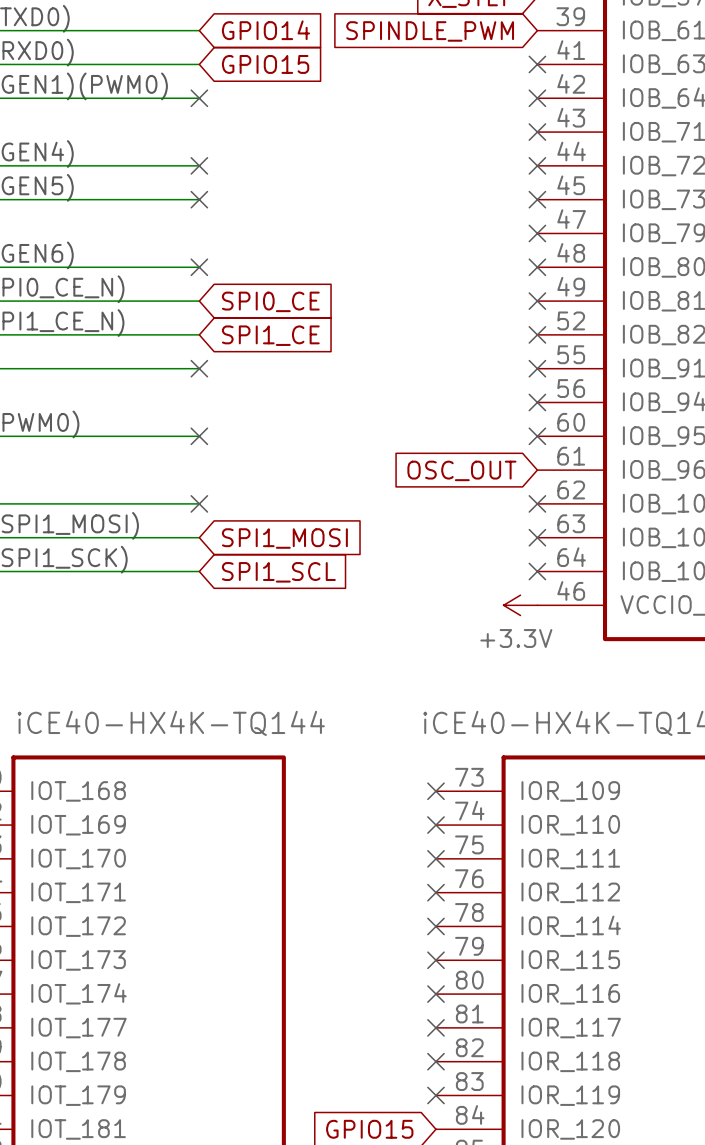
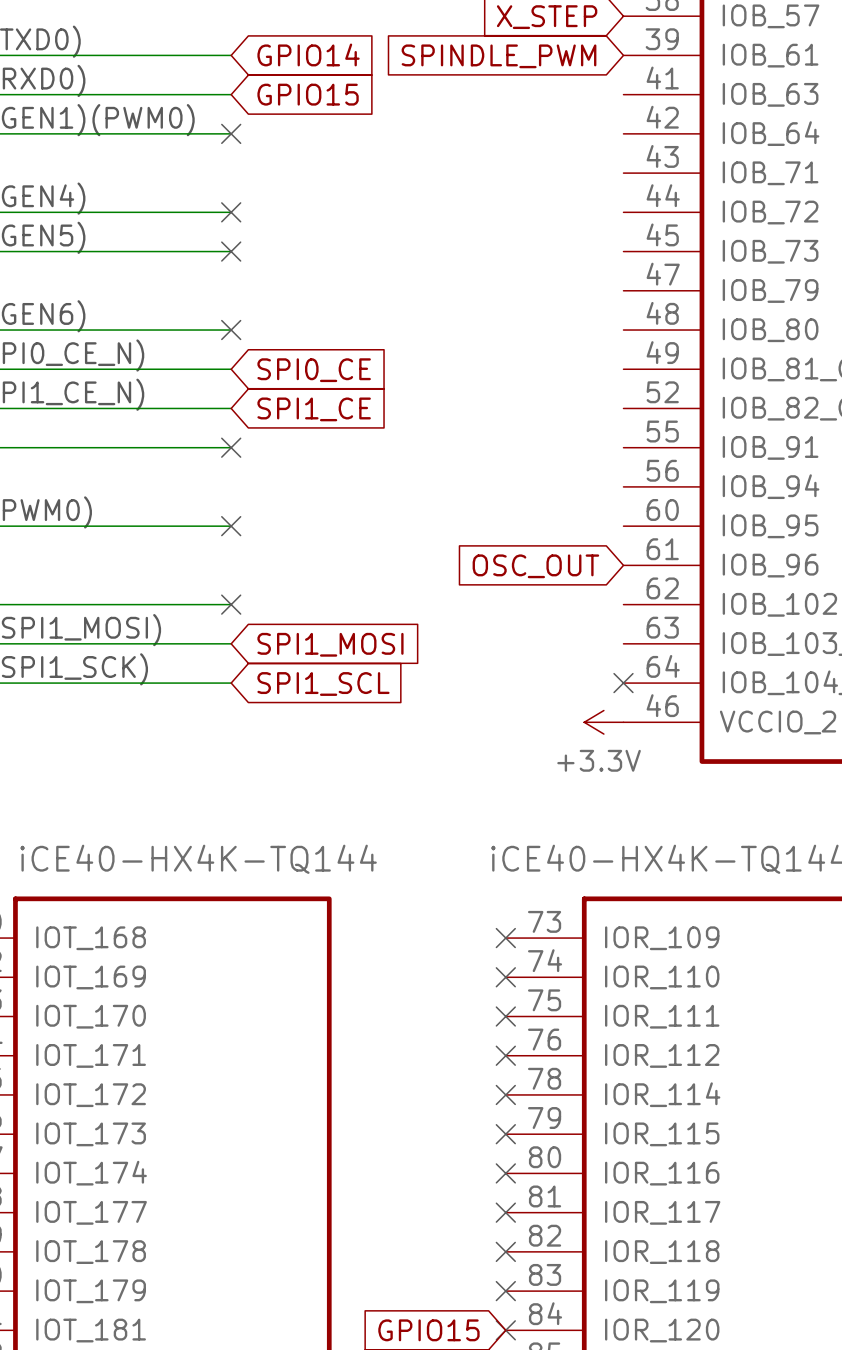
no-connect mark: (537, 64) -> none
no-connect mark: (537, 98) -> none
no-connect mark: (537, 132) -> none
no-connect mark: (537, 165) -> none
no-connect mark: (537, 199) -> none
no-connect mark: (537, 233) -> none
no-connect mark: (537, 267) -> none
no-connect mark: (537, 301) -> none
no-connect mark: (537, 334) -> none
no-connect mark: (537, 368) -> none
no-connect mark: (537, 402) -> none
no-connect mark: (537, 436) -> none
no-connect mark: (537, 503) -> none
no-connect mark: (537, 537) -> none
no-connect mark: none -> (505, 1330)

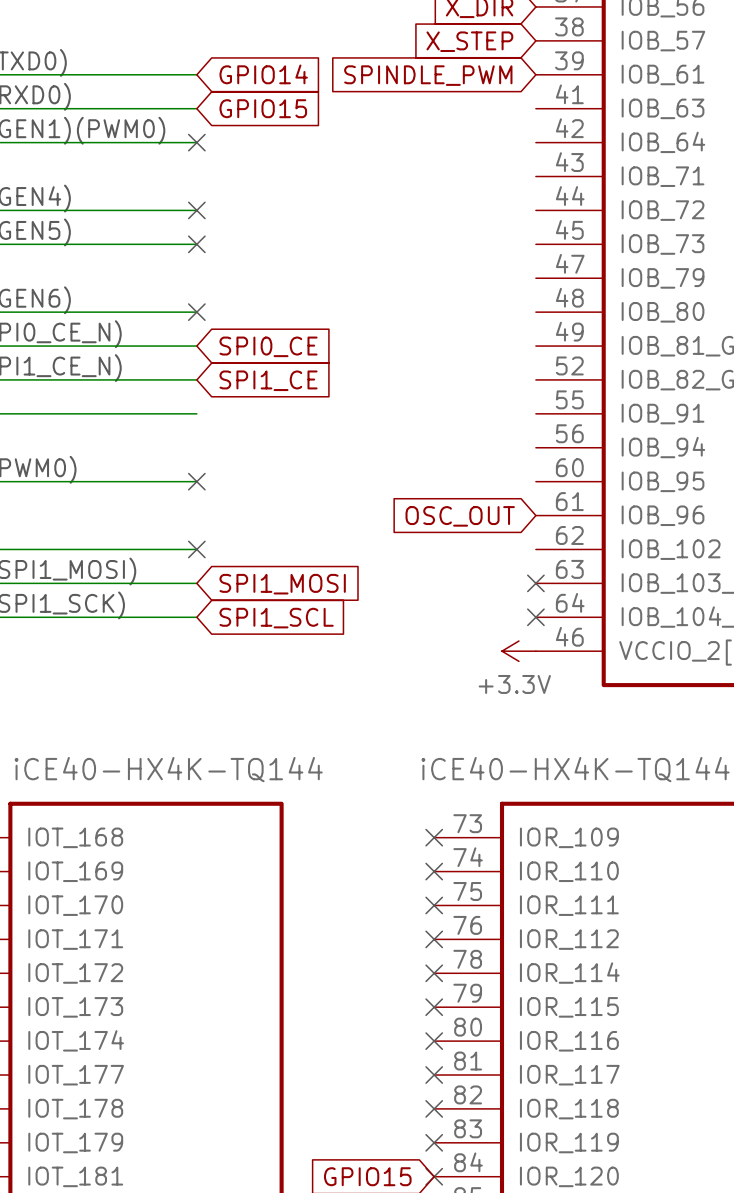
no-connect mark: (231, 447) -> none
no-connect mark: none -> (535, 583)

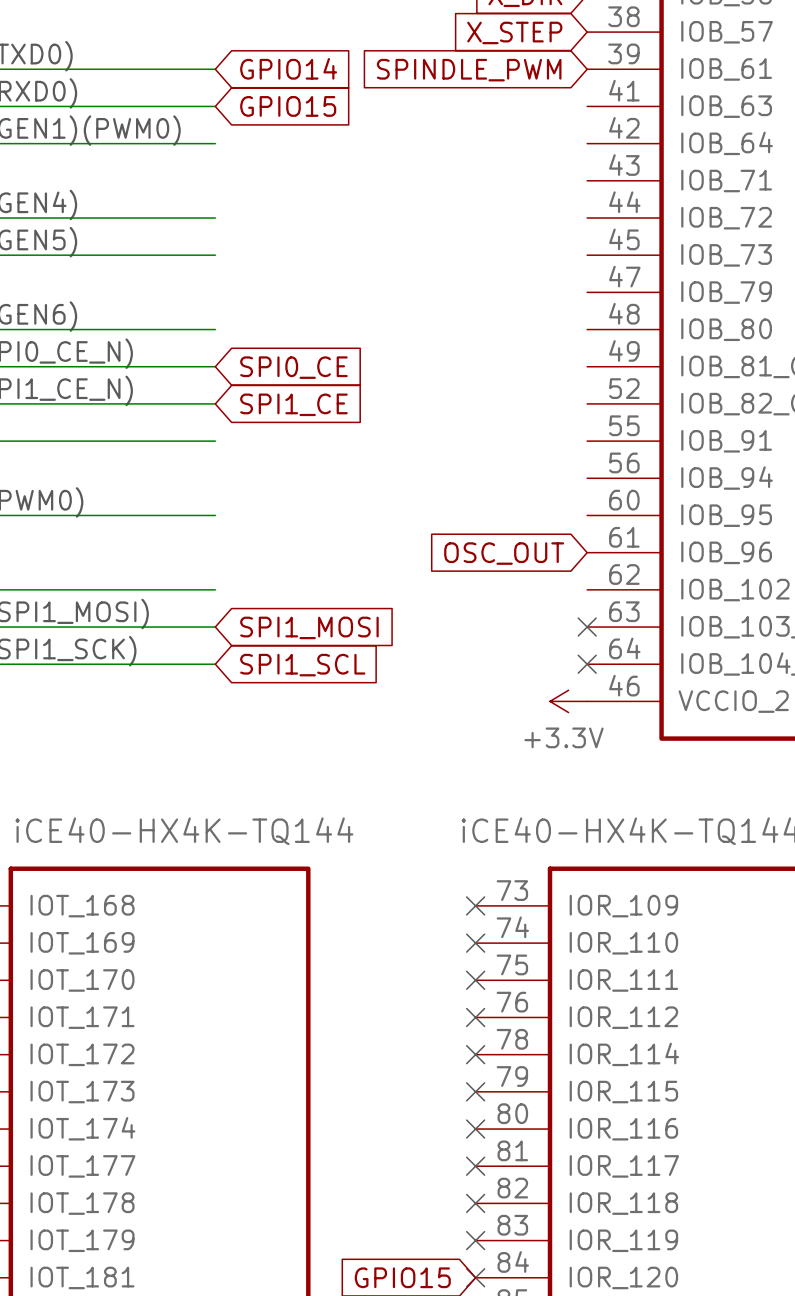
no-connect mark: (196, 142) -> none
no-connect mark: (196, 210) -> none
no-connect mark: (196, 244) -> none
no-connect mark: (196, 312) -> none
no-connect mark: (196, 481) -> none
no-connect mark: (196, 549) -> none

